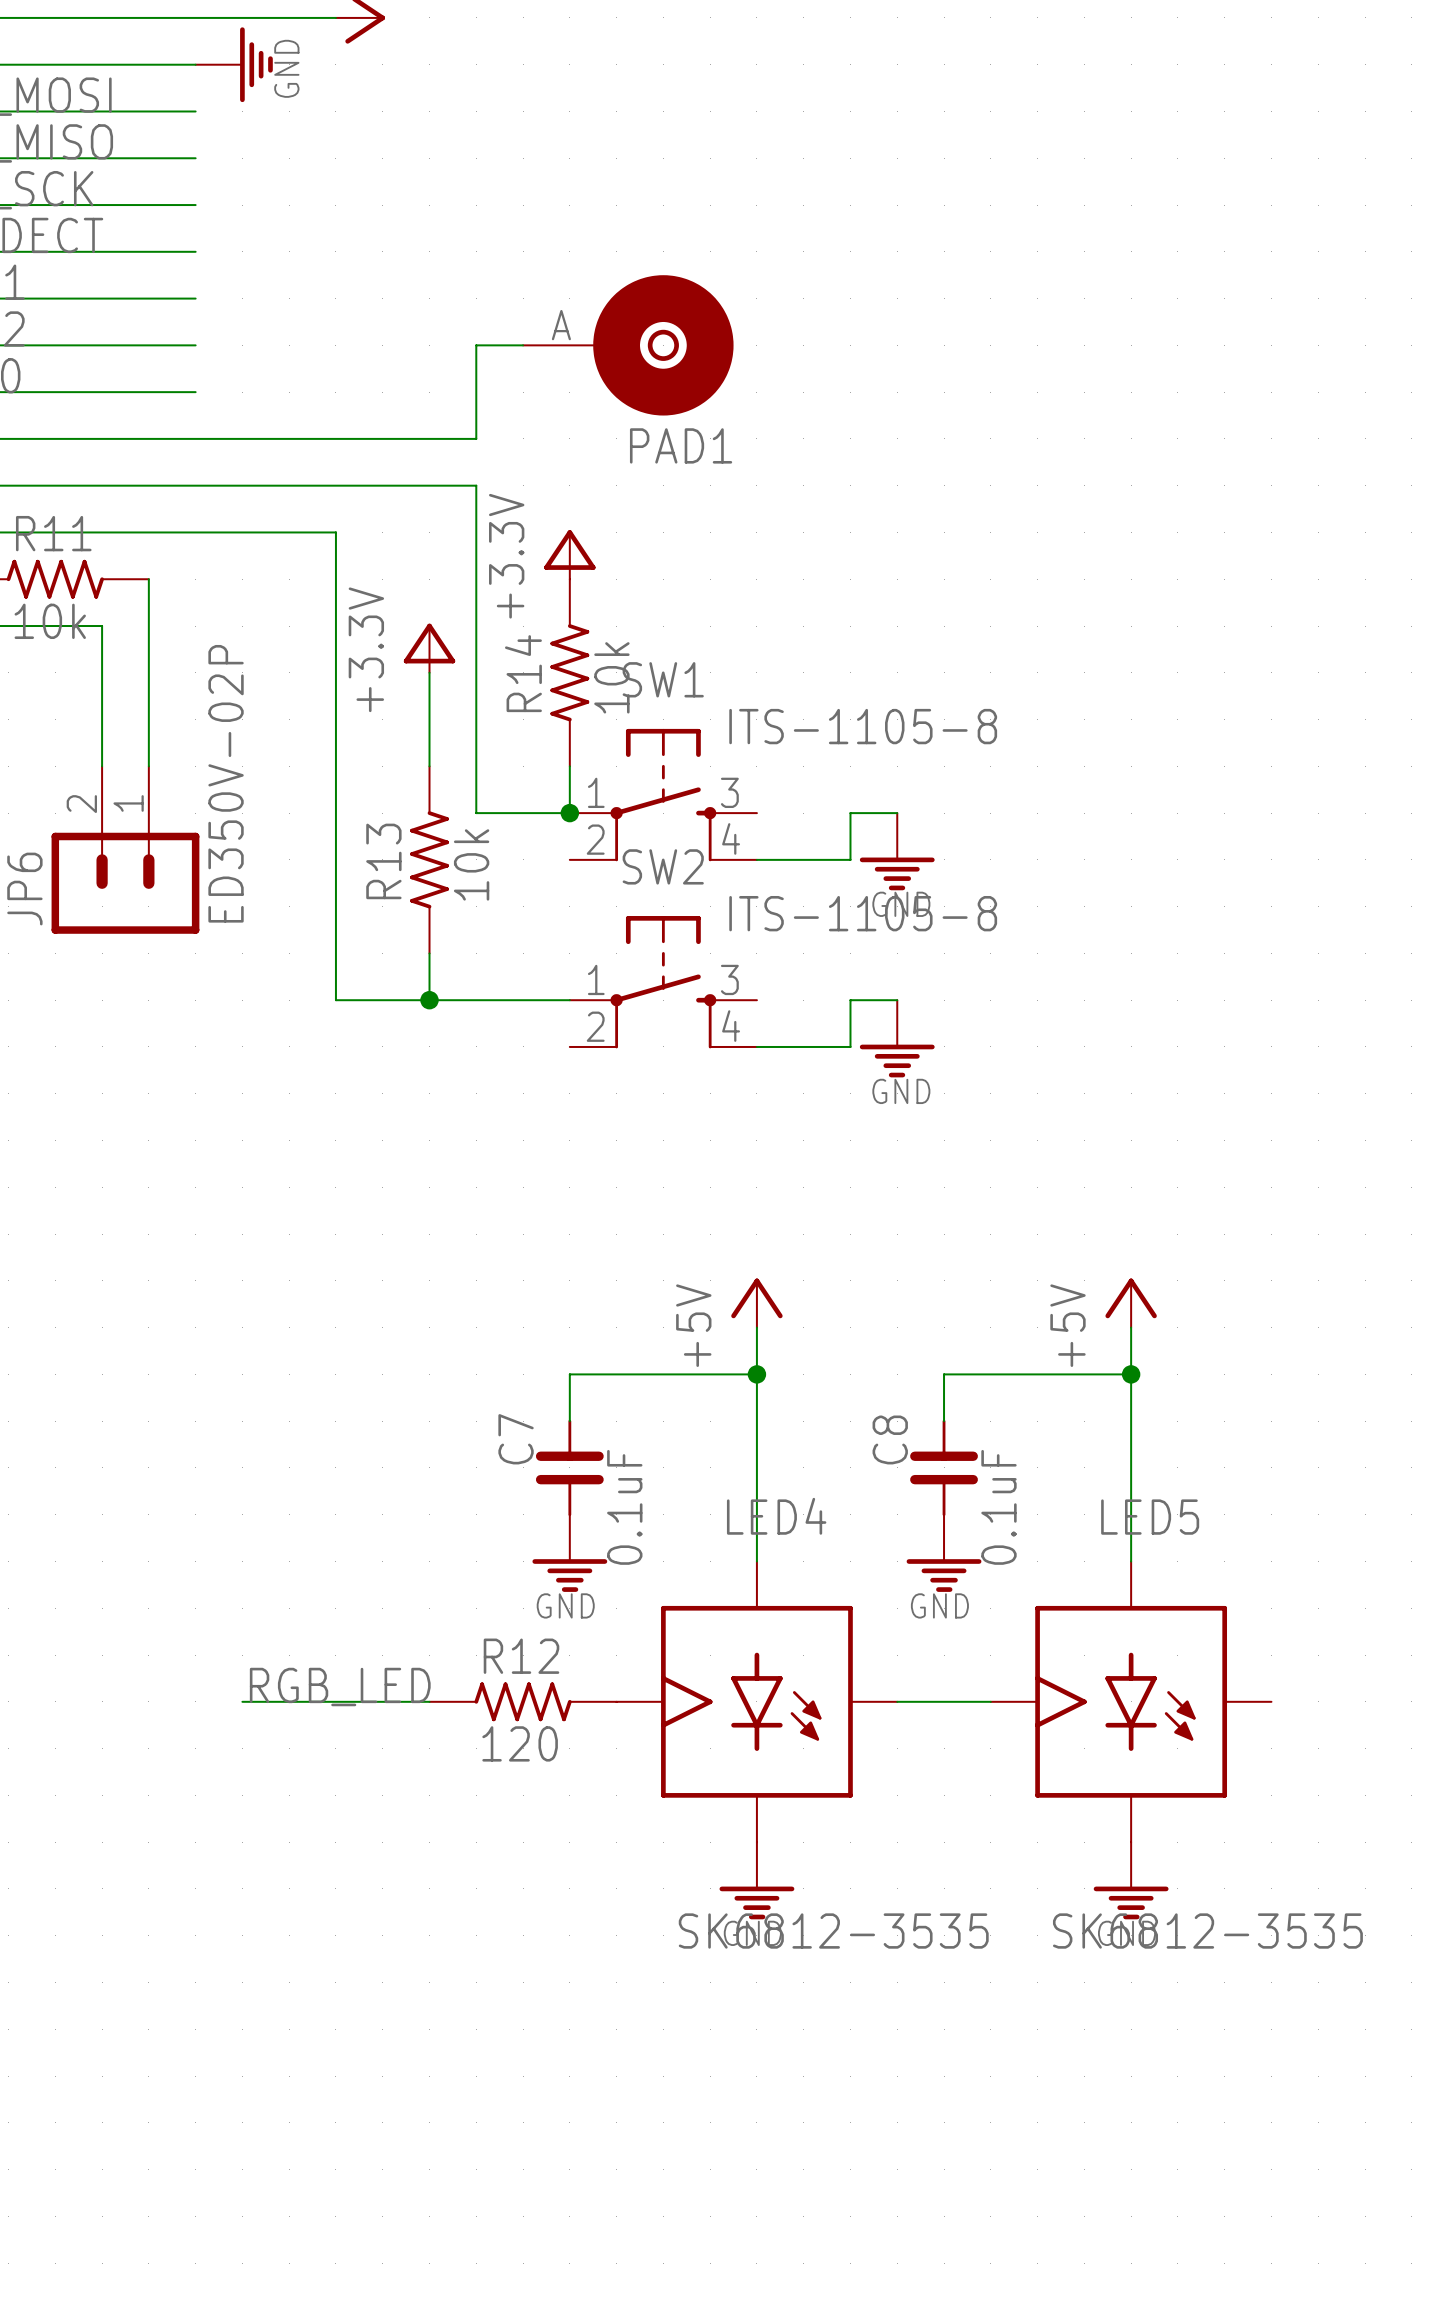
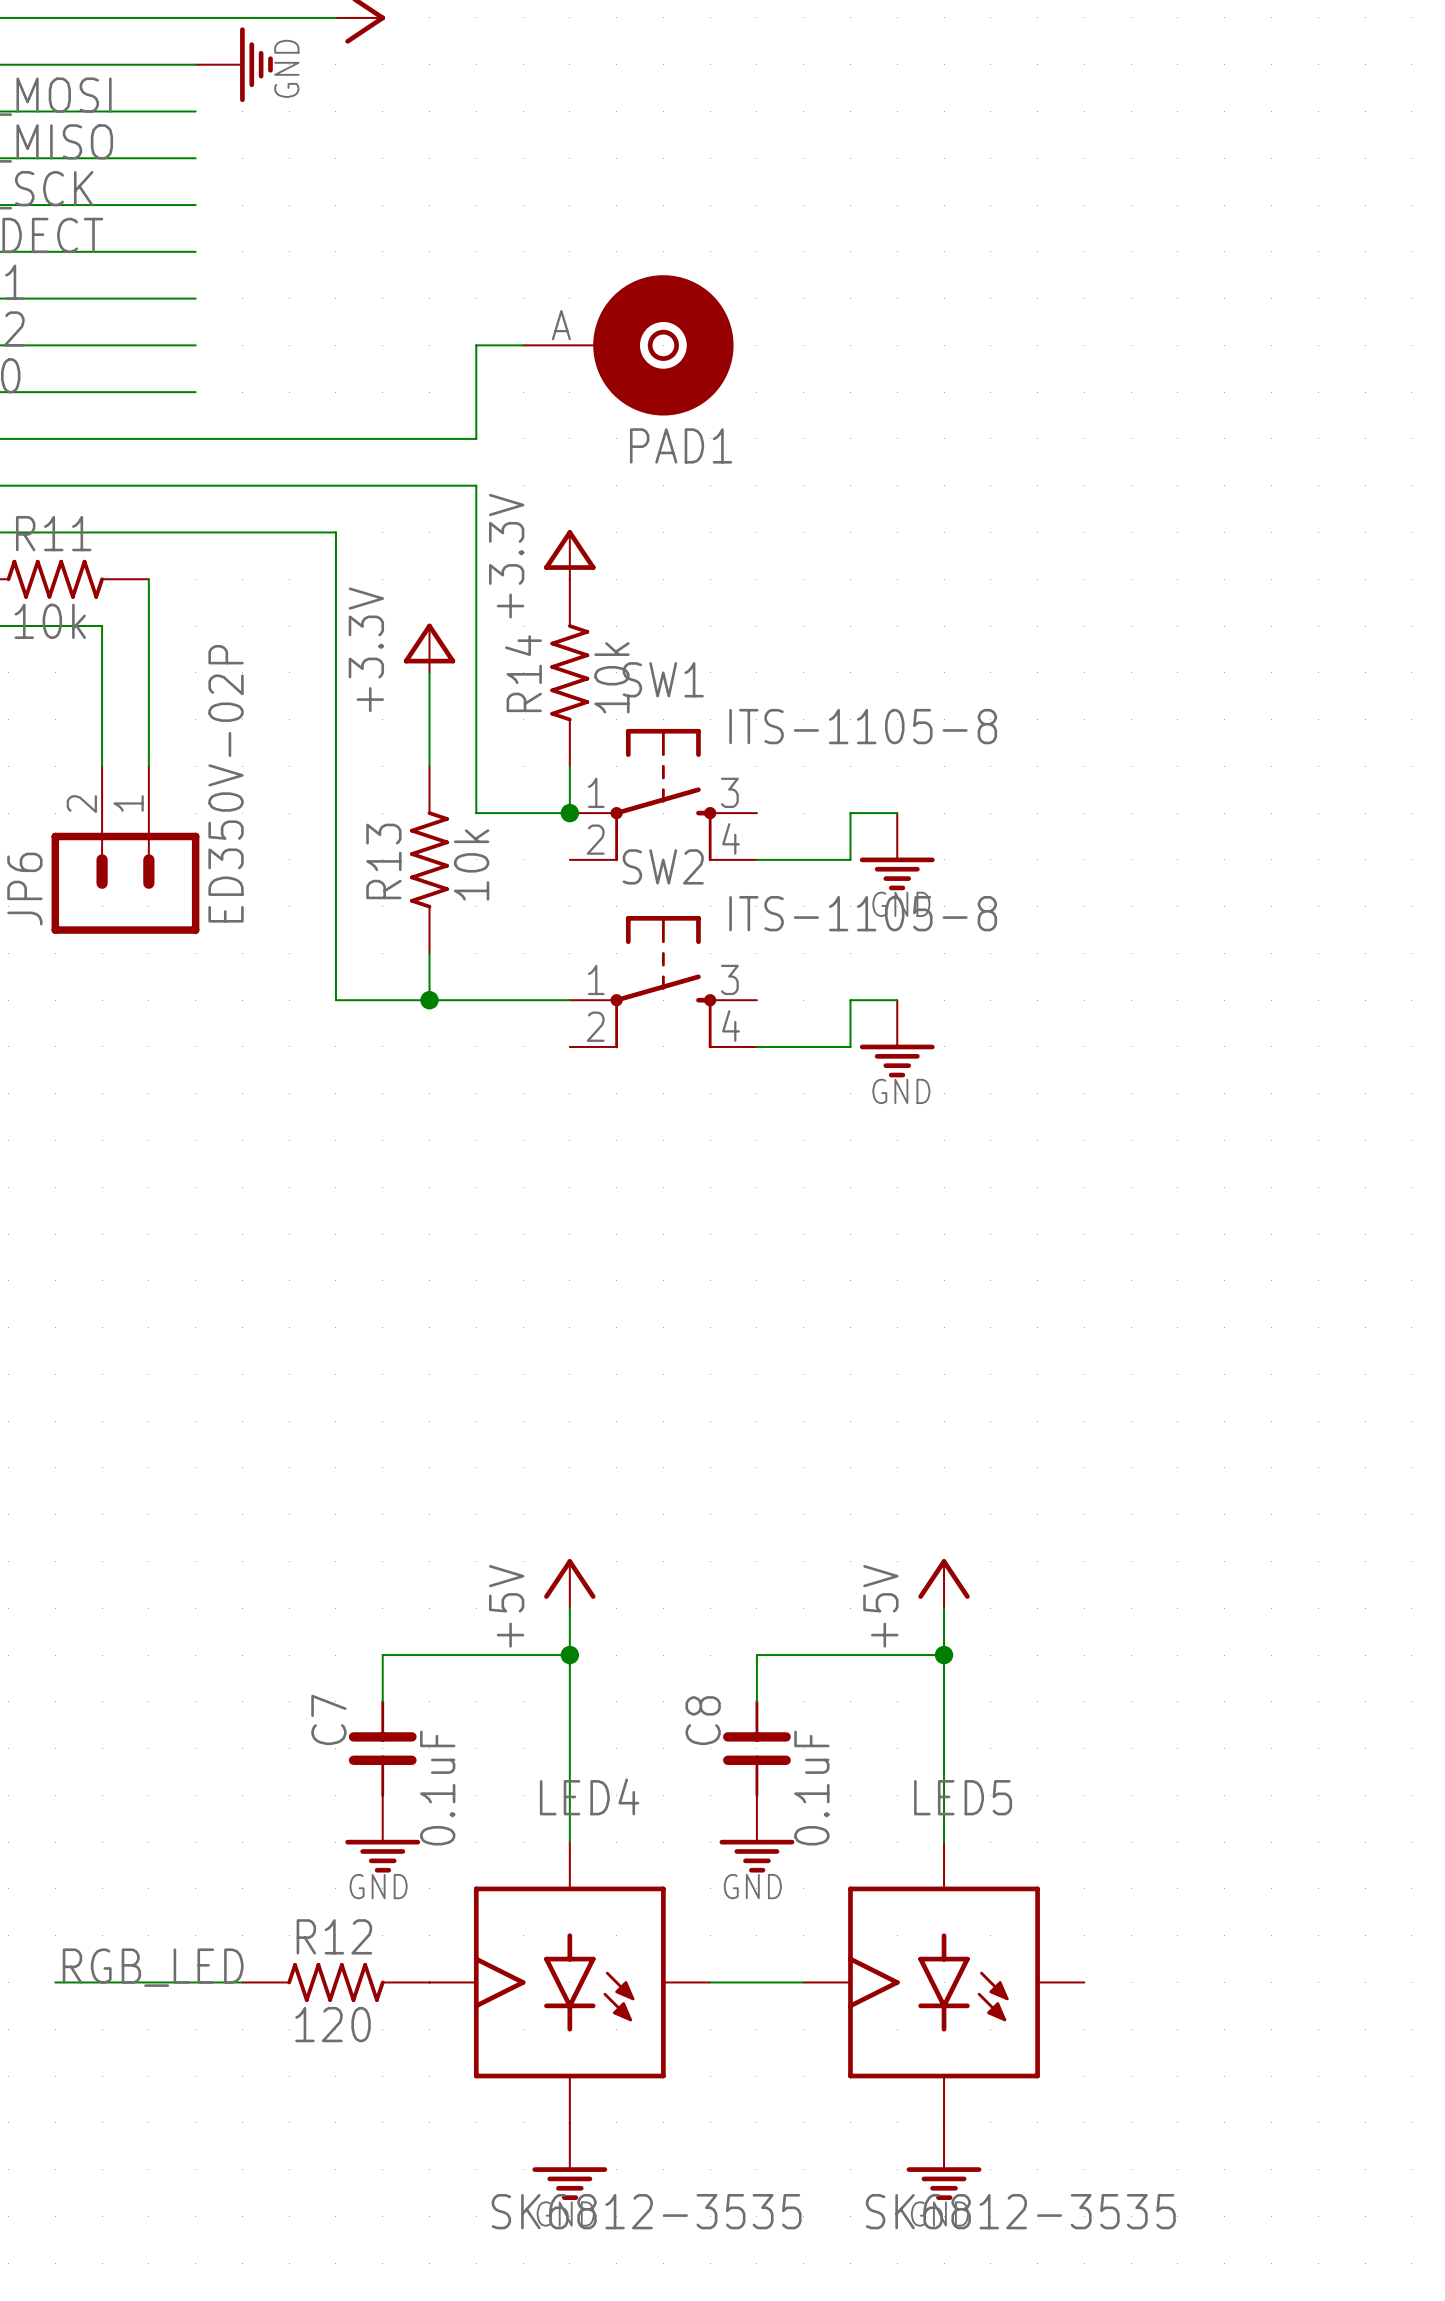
power symbol: +5V (756, 1303) -> none
power symbol: +5V (1131, 1303) -> none
wire: (756, 1327) (756, 1561) -> (569, 1608) (569, 1842)
wire: (1131, 1327) (1131, 1561) -> (944, 1608) (944, 1842)
wire: (756, 1374) (569, 1374) (569, 1421) -> (569, 1655) (382, 1655) (382, 1701)
junction: (756, 1374) -> none
wire: (1131, 1374) (944, 1374) (944, 1421) -> (944, 1655) (756, 1655) (756, 1701)
junction: (1131, 1374) -> none
C7 position: (569, 1467) -> (382, 1748)
C8 position: (944, 1467) -> (756, 1748)
power symbol: (569, 1553) -> none
power symbol: (944, 1553) -> none
power symbol: none -> +5V (569, 1583)
power symbol: none -> +5V (944, 1583)
junction: none -> (569, 1655)
junction: none -> (944, 1655)
label position: RGB_LED (340, 1687) -> RGB_LED (153, 1967)
wire: (242, 1701) (429, 1701) -> (55, 1982) (242, 1982)
R12 position: (523, 1701) -> (335, 1982)
LED4 position: (756, 1701) -> (569, 1982)
wire: (897, 1701) (990, 1701) -> (710, 1982) (803, 1982)
LED5 position: (1131, 1701) -> (944, 1982)
power symbol: none -> (382, 1833)
power symbol position: (756, 1880) -> (756, 1833)
power symbol: (1131, 1880) -> none
power symbol: none -> (569, 2161)
power symbol: none -> (944, 2161)

